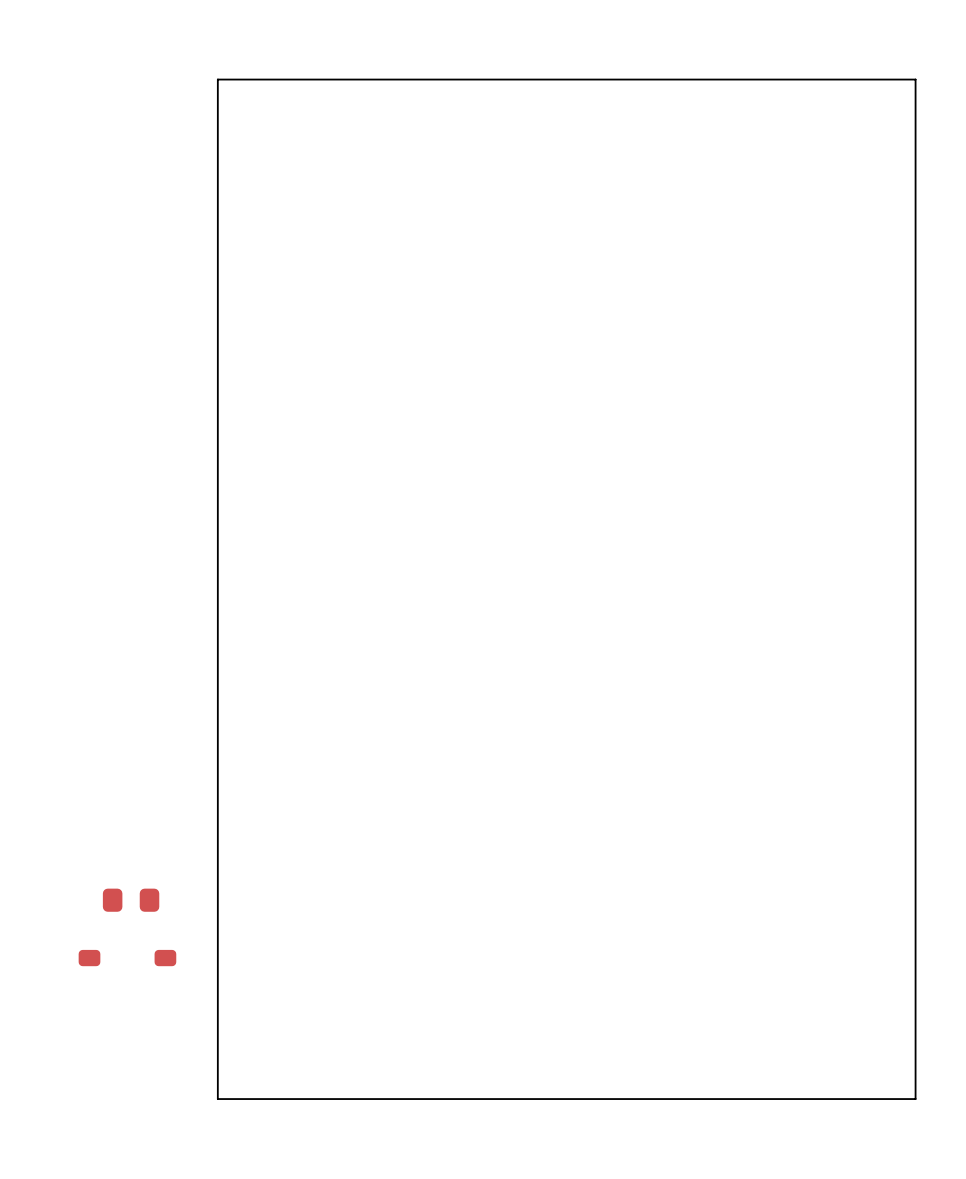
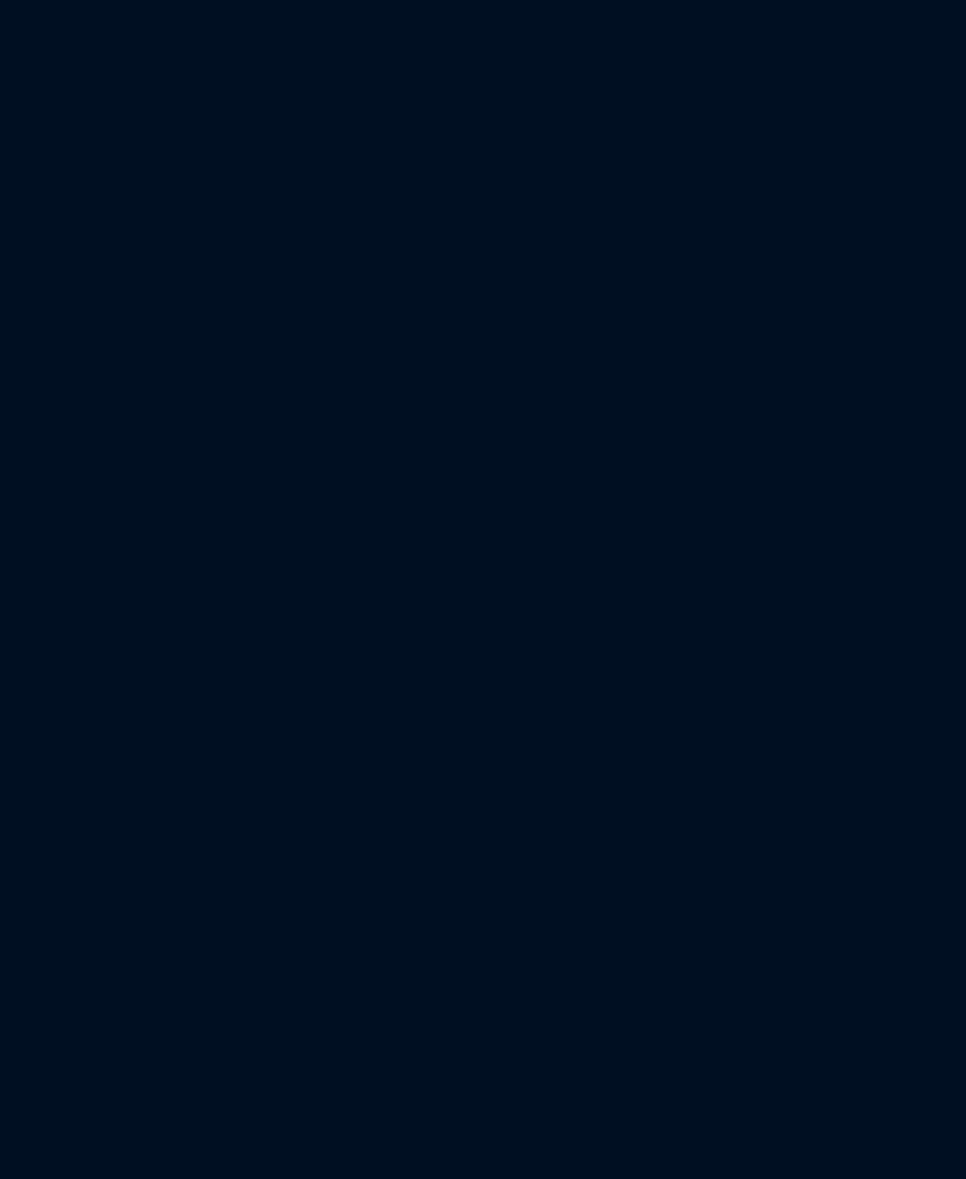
board edge: (915, 79) (217, 79) (217, 1099) (915, 1099) (915, 79) -> none
part: (131, 900) -> none
part: (127, 958) -> none

